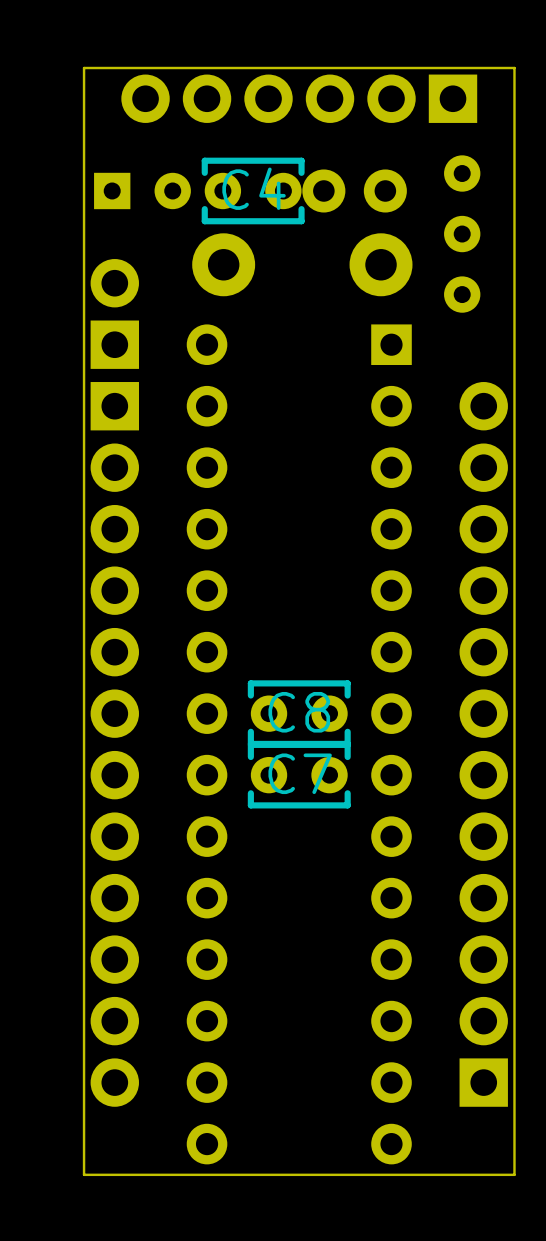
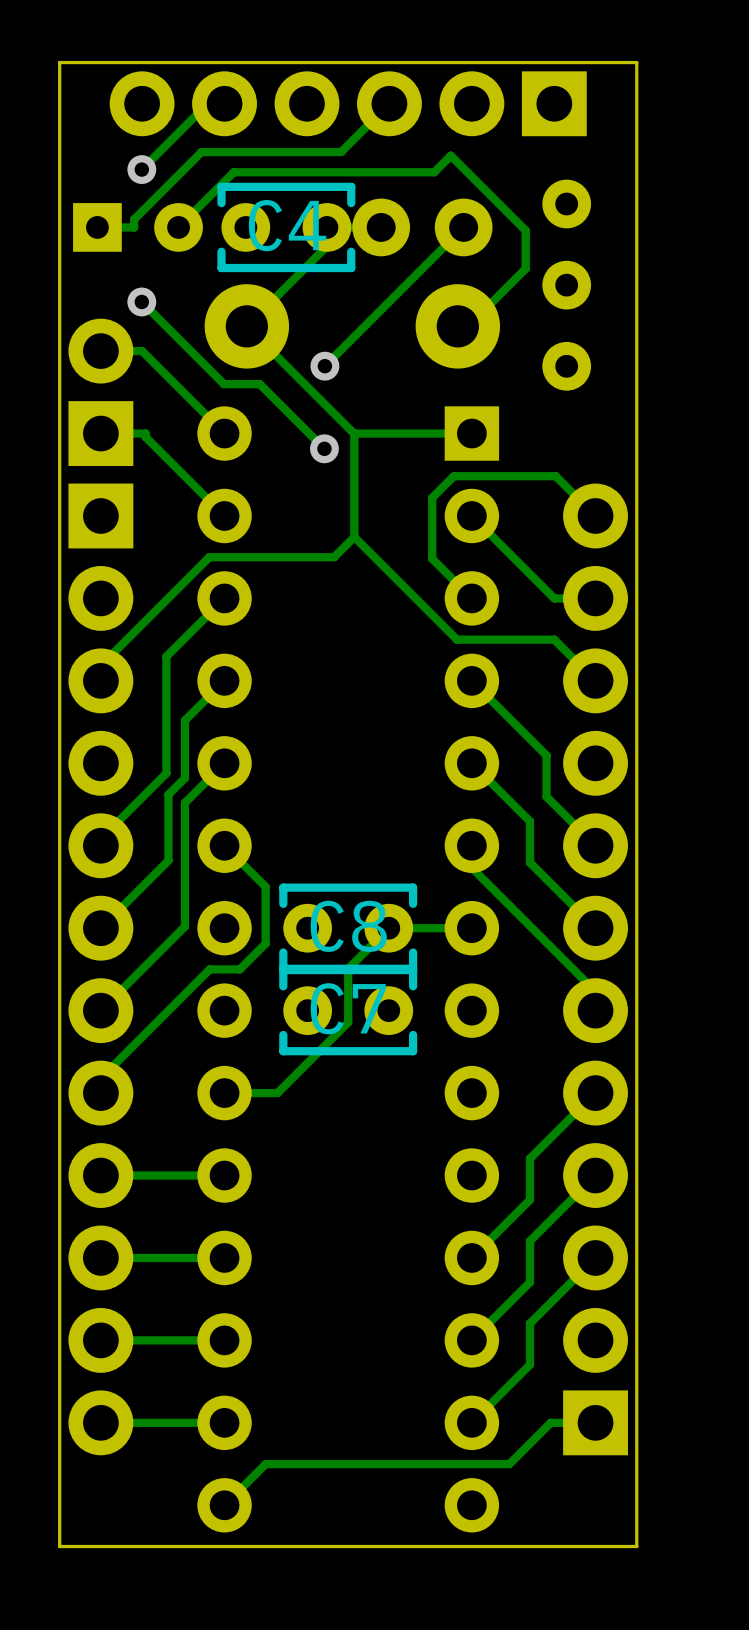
track: none -> (224, 103) (207, 103) (141, 169)
track: none -> (389, 103) (341, 152) (201, 152) (134, 219) (134, 227) (97, 227)
via: none -> (141, 169)
track: none -> (178, 227) (233, 172) (434, 172) (450, 155) (525, 230) (525, 268) (468, 326) (457, 326)
track: none -> (381, 227) (326, 227) (326, 246) (246, 326) (354, 433) (471, 433)
track: none -> (463, 227) (324, 366)
track: none -> (141, 301) (223, 384) (259, 384) (324, 448)
via: none -> (141, 301)
track: none -> (100, 351) (142, 351) (224, 433)
via: none -> (324, 366)
track: none -> (100, 433) (145, 433) (145, 437) (224, 515)
track: none -> (354, 433) (354, 537)
via: none -> (324, 448)
track: none -> (471, 515) (554, 598) (595, 598)
track: none -> (595, 515) (555, 476) (453, 476) (432, 497) (432, 558) (471, 598)
track: none -> (354, 537) (334, 557) (209, 557) (100, 665) (100, 680)
track: none -> (354, 537) (456, 639) (554, 639) (595, 680)
track: none -> (224, 598) (166, 656) (166, 773) (100, 838) (100, 845)
track: none -> (224, 680) (184, 720) (184, 778) (168, 794) (168, 860) (100, 928)
track: none -> (471, 680) (546, 755) (546, 796) (595, 845)
track: none -> (224, 763) (184, 802) (184, 926) (100, 1010)
track: none -> (471, 763) (530, 821) (530, 862) (595, 928)
track: none -> (224, 845) (265, 886) (265, 943) (239, 969) (209, 969) (100, 1078) (100, 1093)
track: none -> (471, 845) (471, 867) (595, 991) (595, 1010)
track: none -> (471, 928) (388, 928) (348, 968) (348, 1022) (277, 1093) (224, 1093)
track: none -> (595, 1093) (530, 1158) (530, 1199) (471, 1257)
track: none -> (224, 1175) (100, 1175)
track: none -> (595, 1175) (530, 1241) (530, 1282) (471, 1340)
track: none -> (224, 1257) (100, 1257)
track: none -> (595, 1257) (530, 1323) (530, 1364) (471, 1422)
track: none -> (224, 1340) (100, 1340)
track: none -> (224, 1422) (100, 1422)
track: none -> (595, 1422) (550, 1422) (509, 1464) (265, 1464) (224, 1505)

